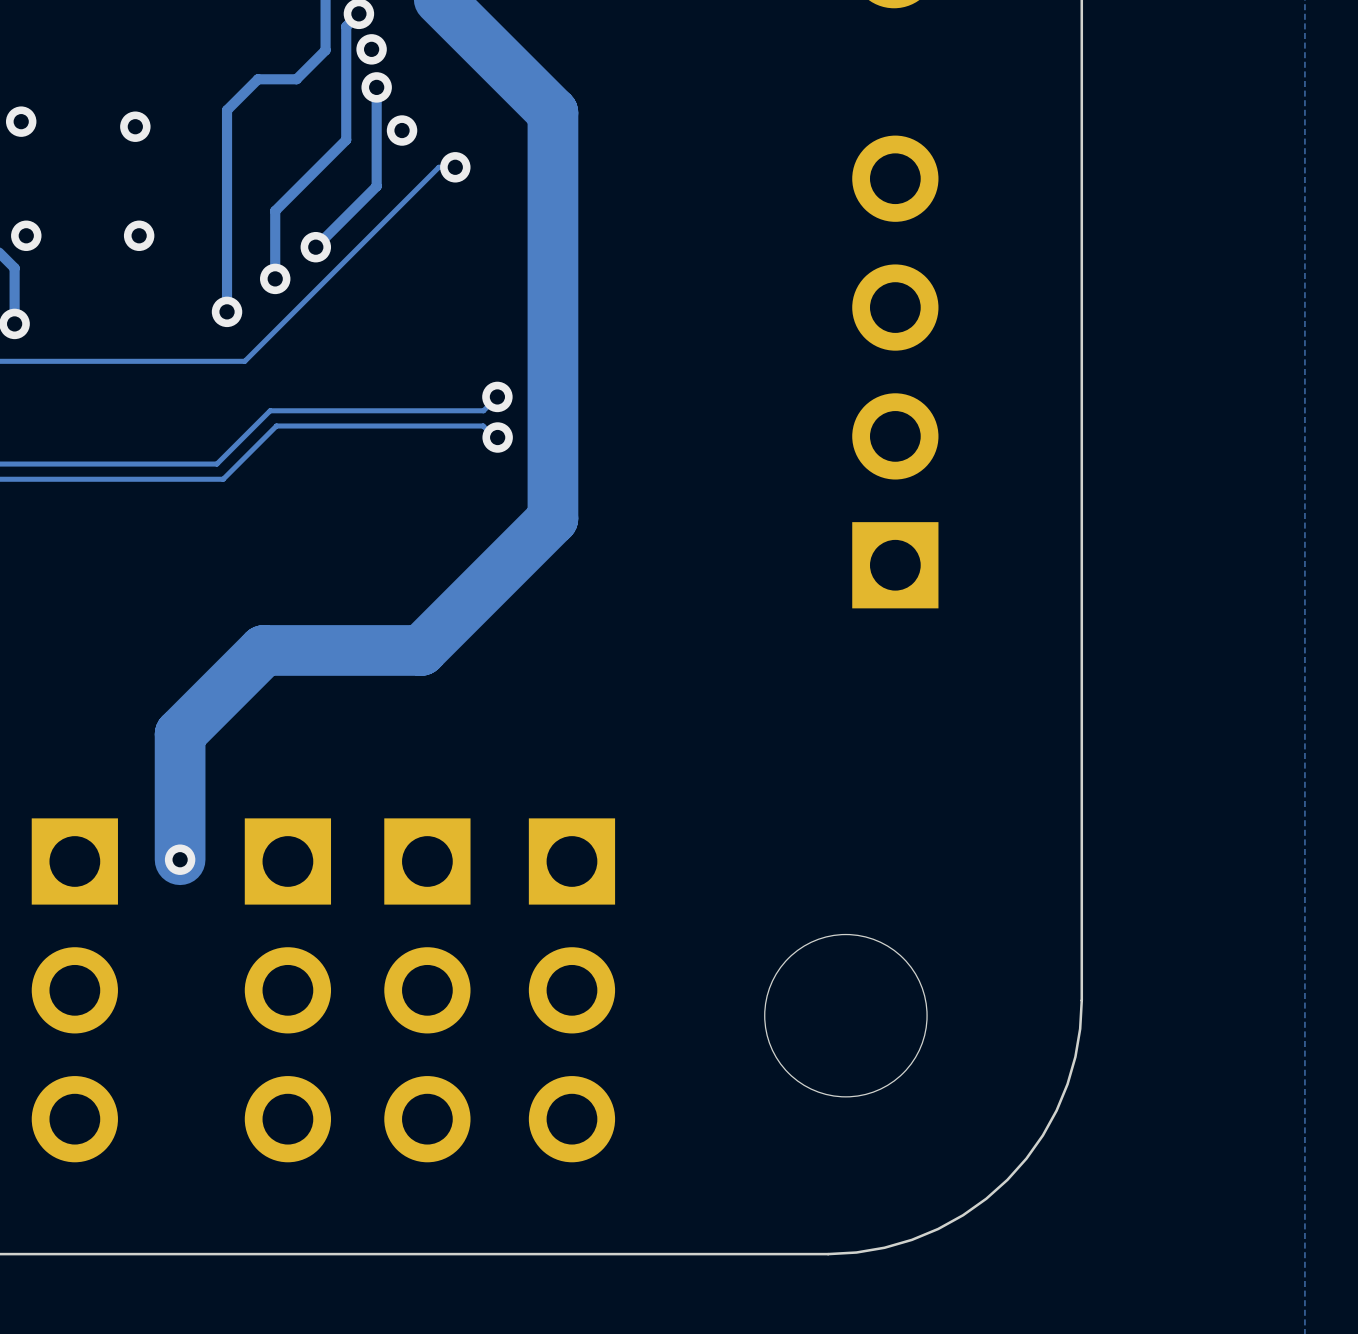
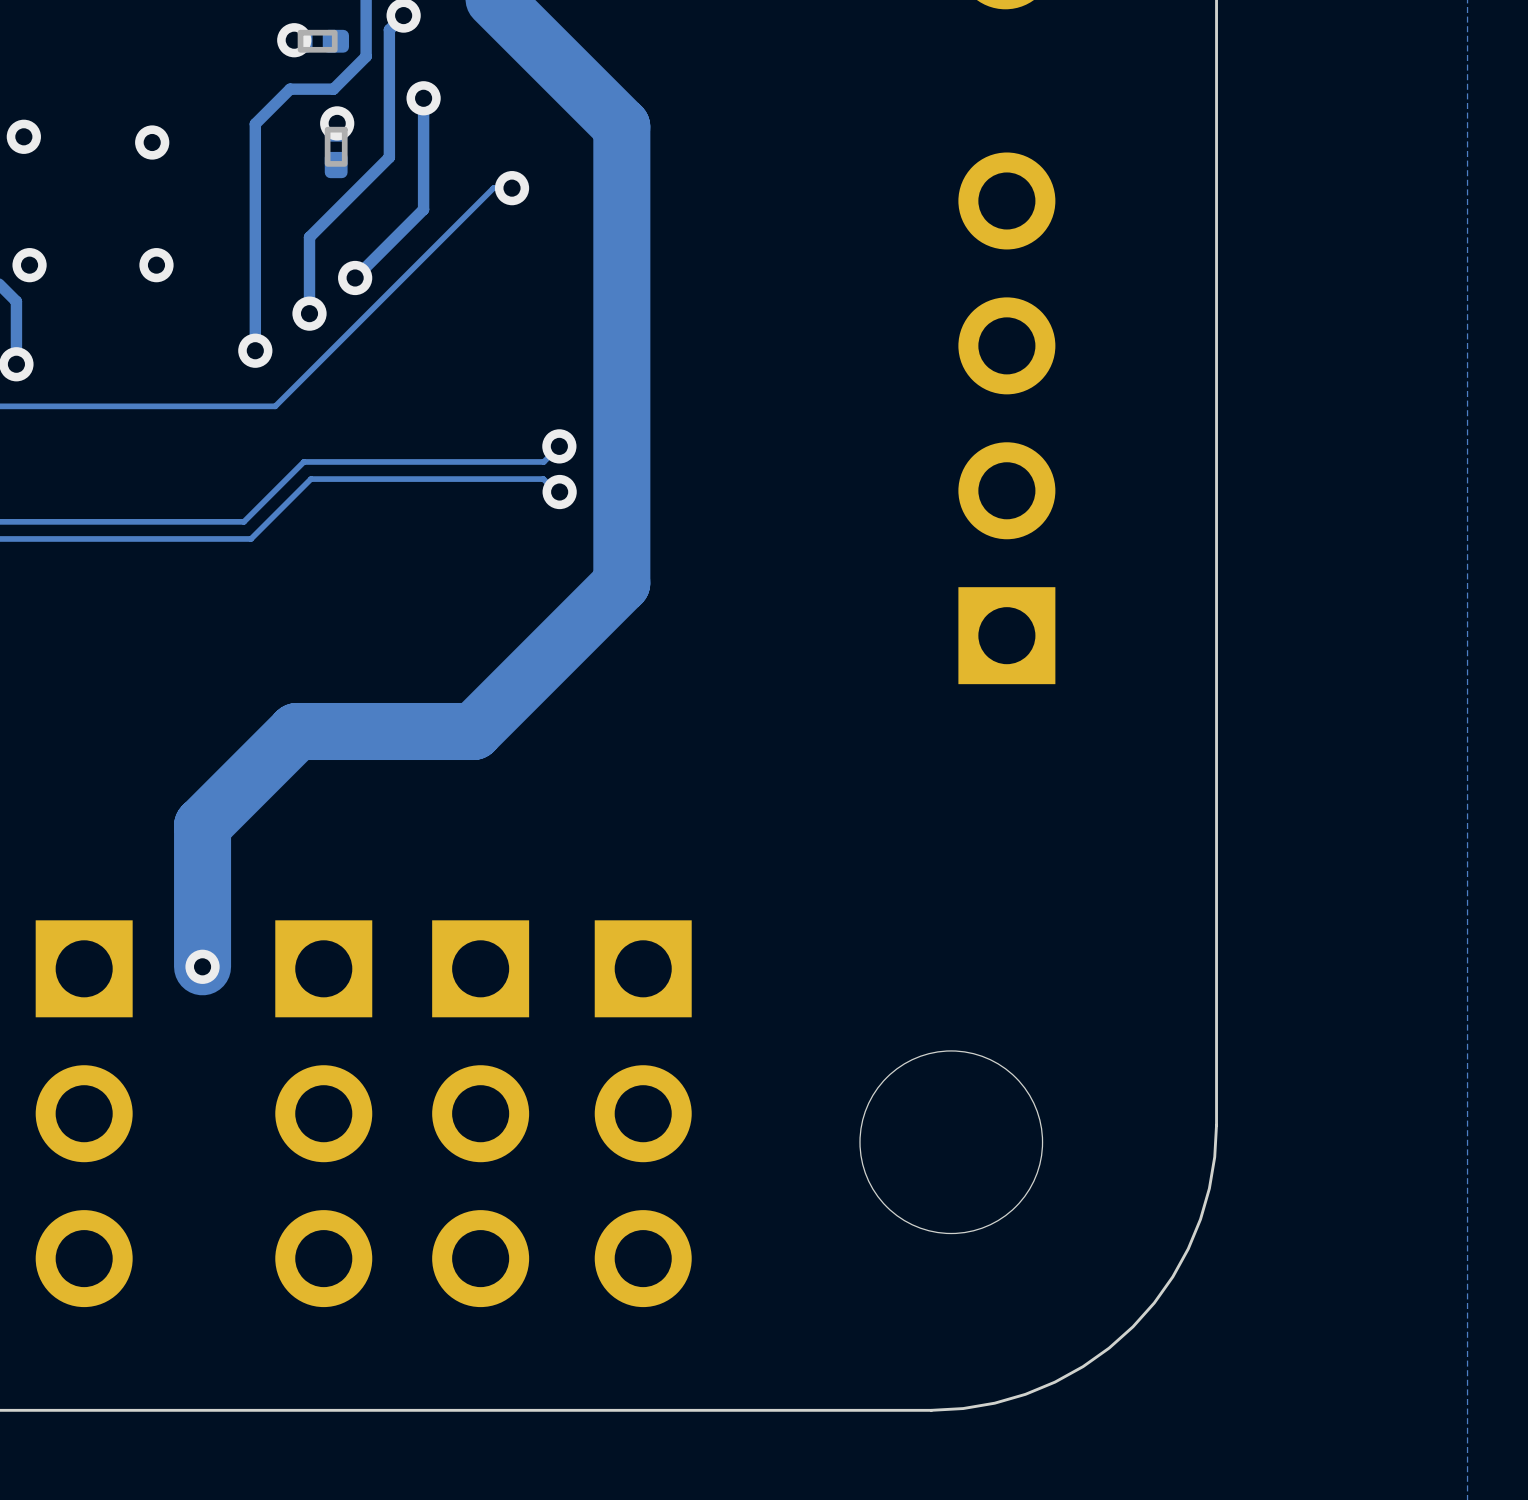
via: none -> (294, 40)
part: none -> (317, 41)
via: (371, 49) -> none
via: none -> (337, 123)
part: none -> (336, 146)
via: (402, 130) -> none

